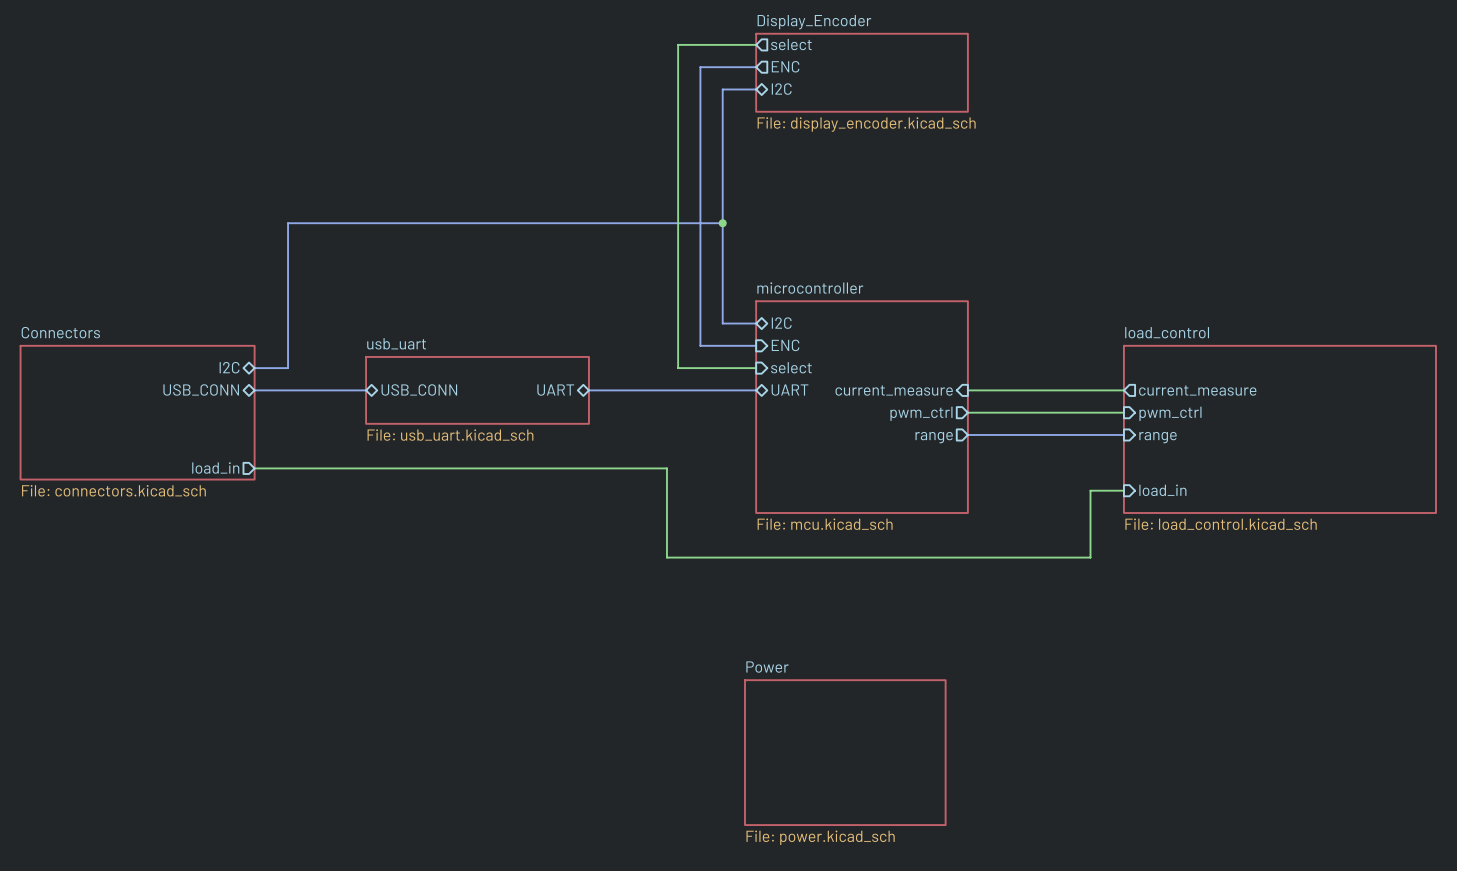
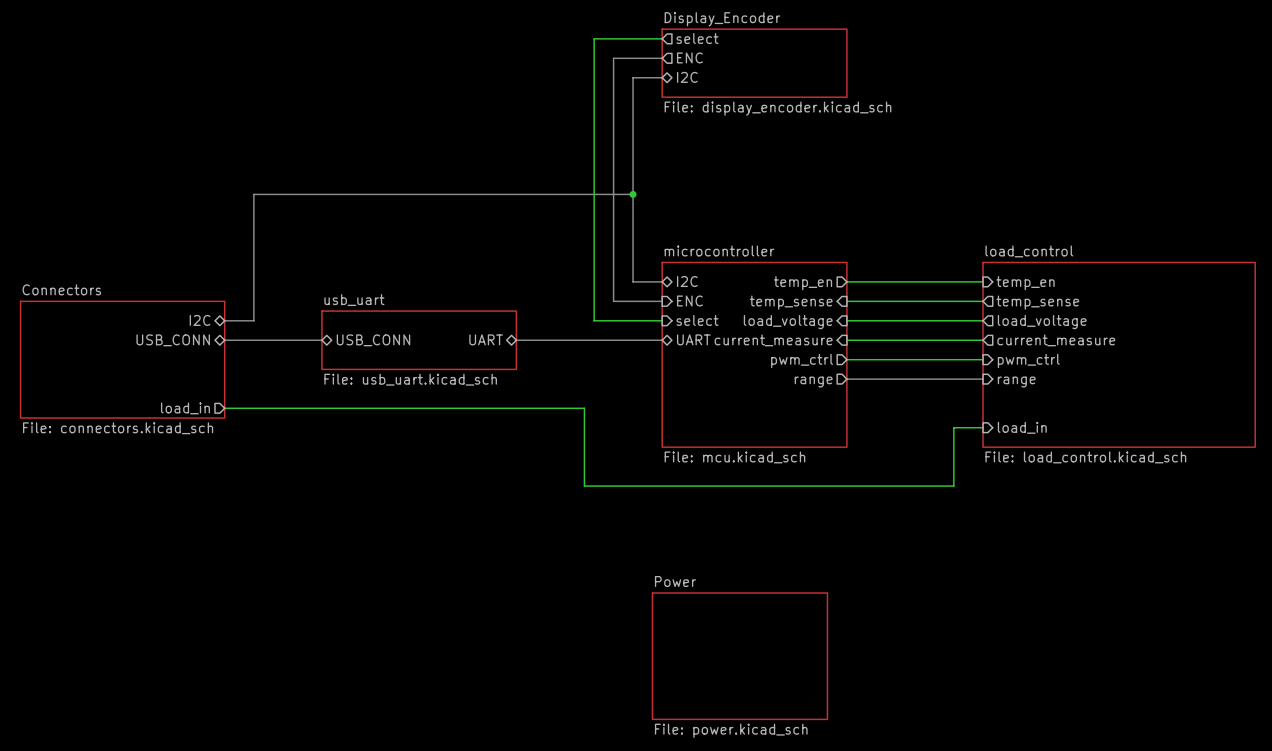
wire: none -> (846, 281) (983, 281)
sheet pin: none -> temp_en (803, 283)
sheet pin: none -> temp_en (1025, 283)
wire: none -> (846, 301) (983, 301)
sheet pin: none -> temp_sense (791, 302)
sheet pin: none -> temp_sense (1037, 302)
wire: none -> (846, 320) (983, 320)
sheet pin: none -> load_voltage (788, 322)
sheet pin: none -> load_voltage (1042, 322)
sheet load_control: none -> File: load_control.kicad_sch (1119, 354)
sheet load_control: File: load_control.kicad_sch (1279, 429) -> none

